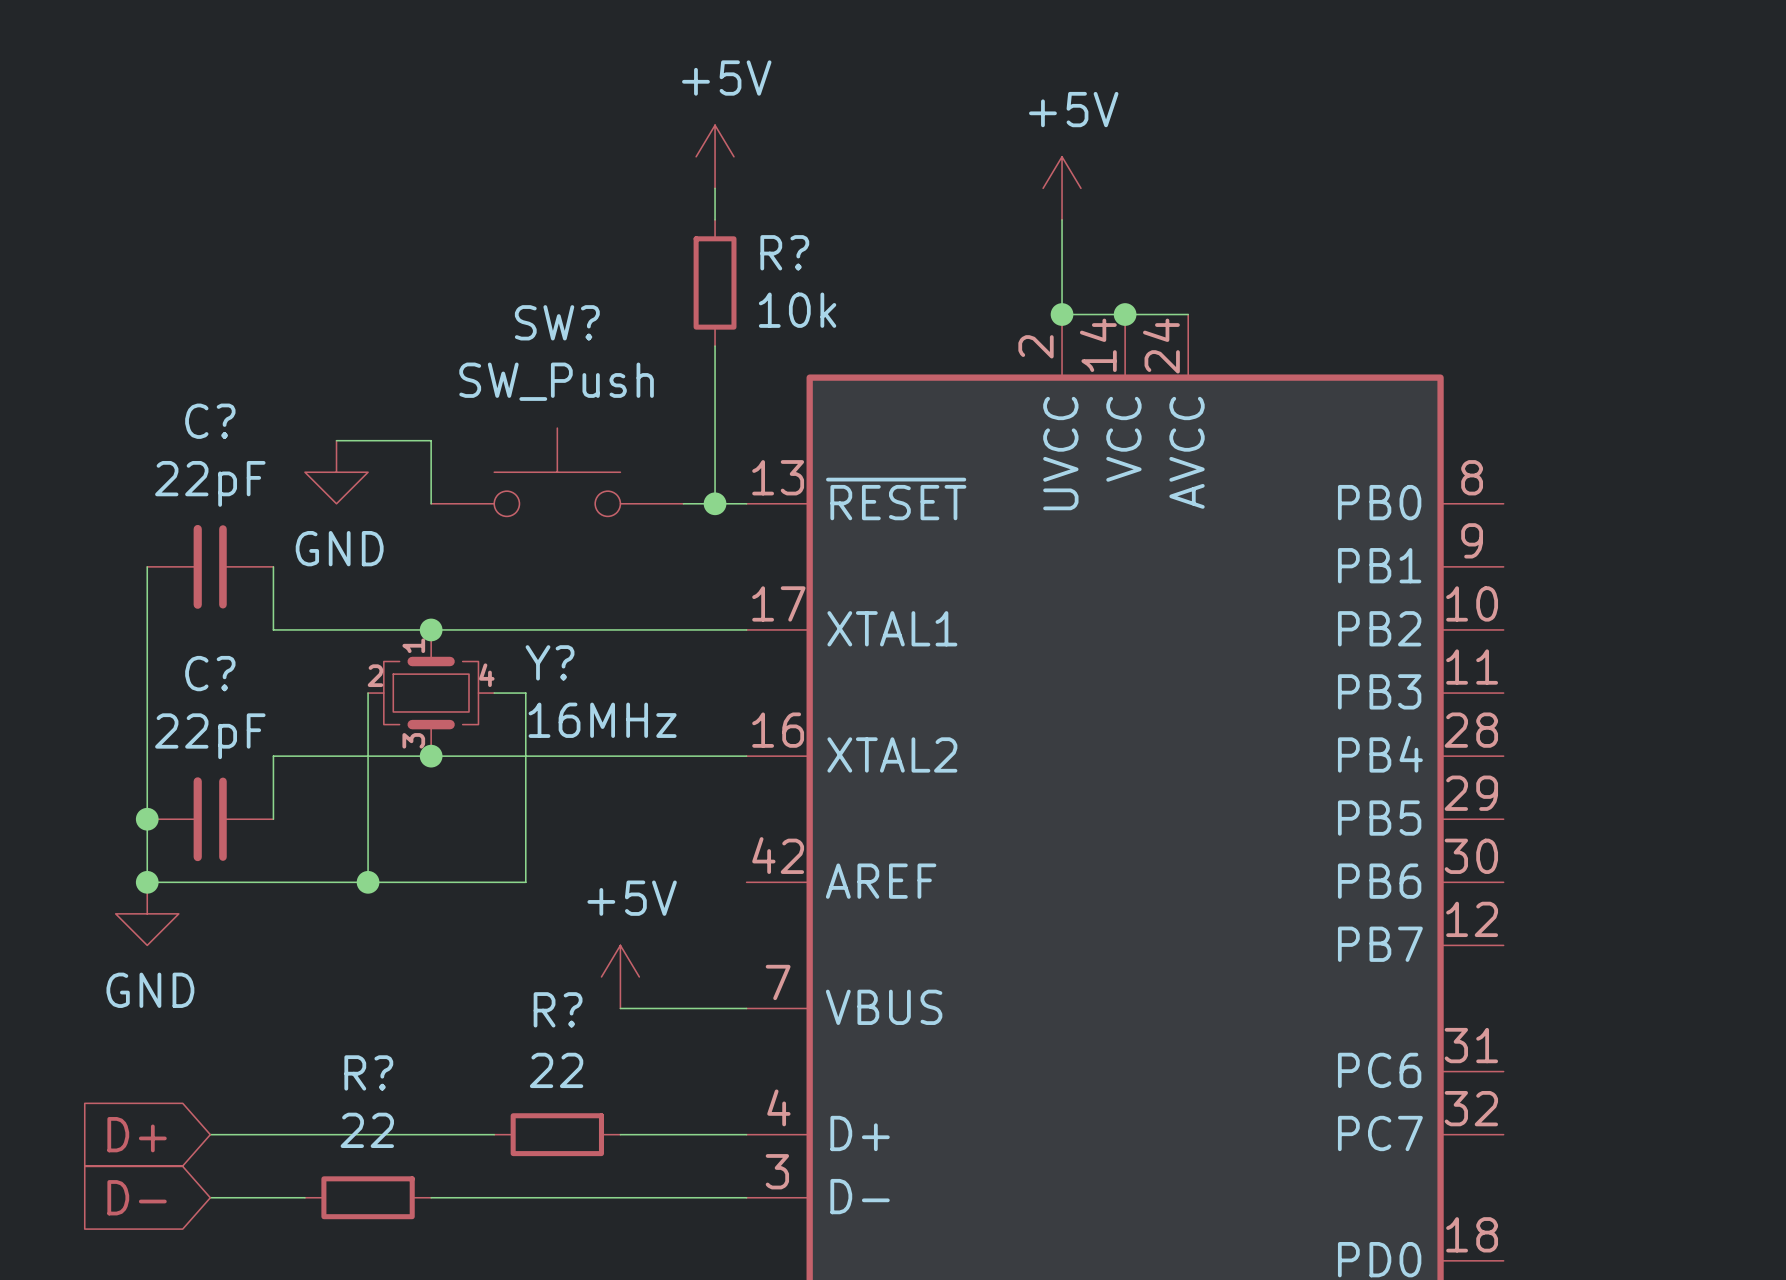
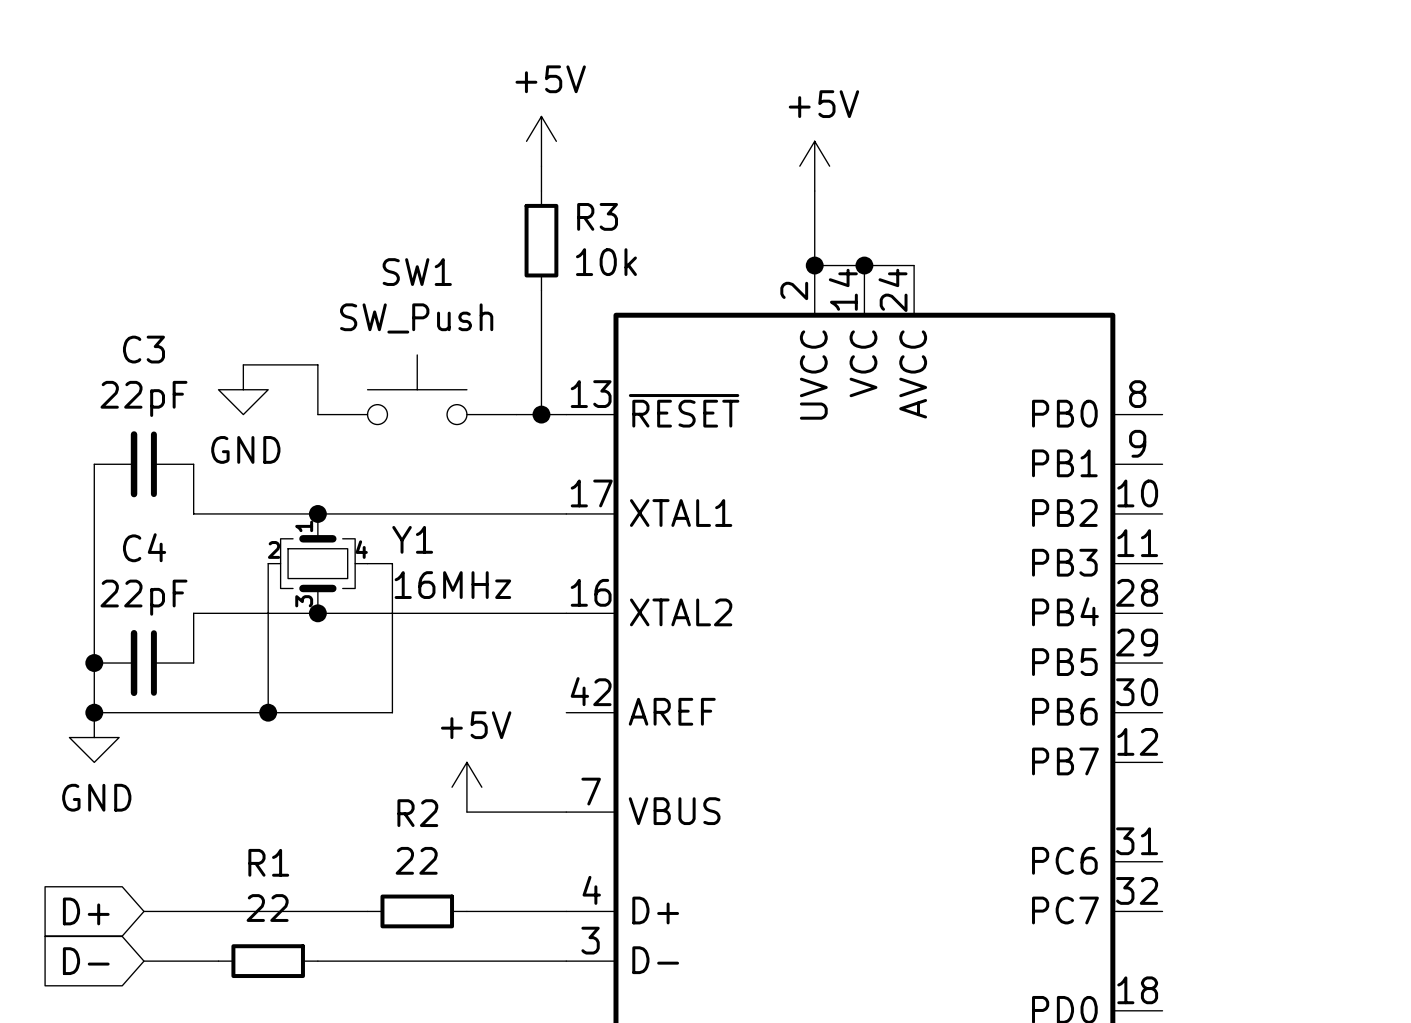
R? name: R? (784, 252) -> R3 (597, 216)
SW? name: SW? (557, 322) -> SW1 (417, 272)
C? name: C? (210, 421) -> C3 (143, 349)
Y? name: Y? (550, 662) -> Y1 (412, 539)
C? name: C? (210, 673) -> C4 (144, 547)
R? name: R? (558, 1009) -> R2 (417, 813)
R? name: R? (368, 1072) -> R1 (268, 862)

